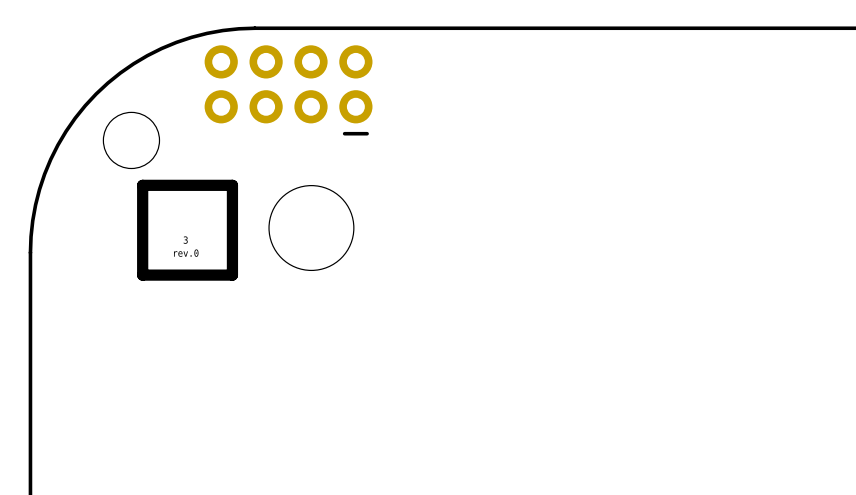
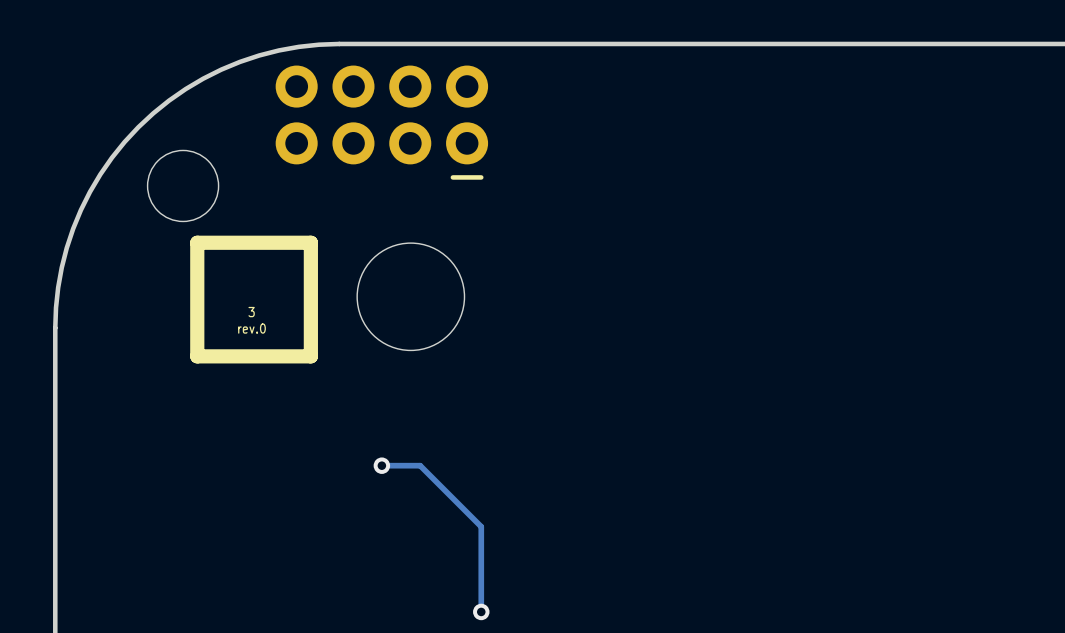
track: none -> (381, 465) (420, 465) (481, 526) (481, 611)
via: none -> (381, 465)
via: none -> (481, 611)

